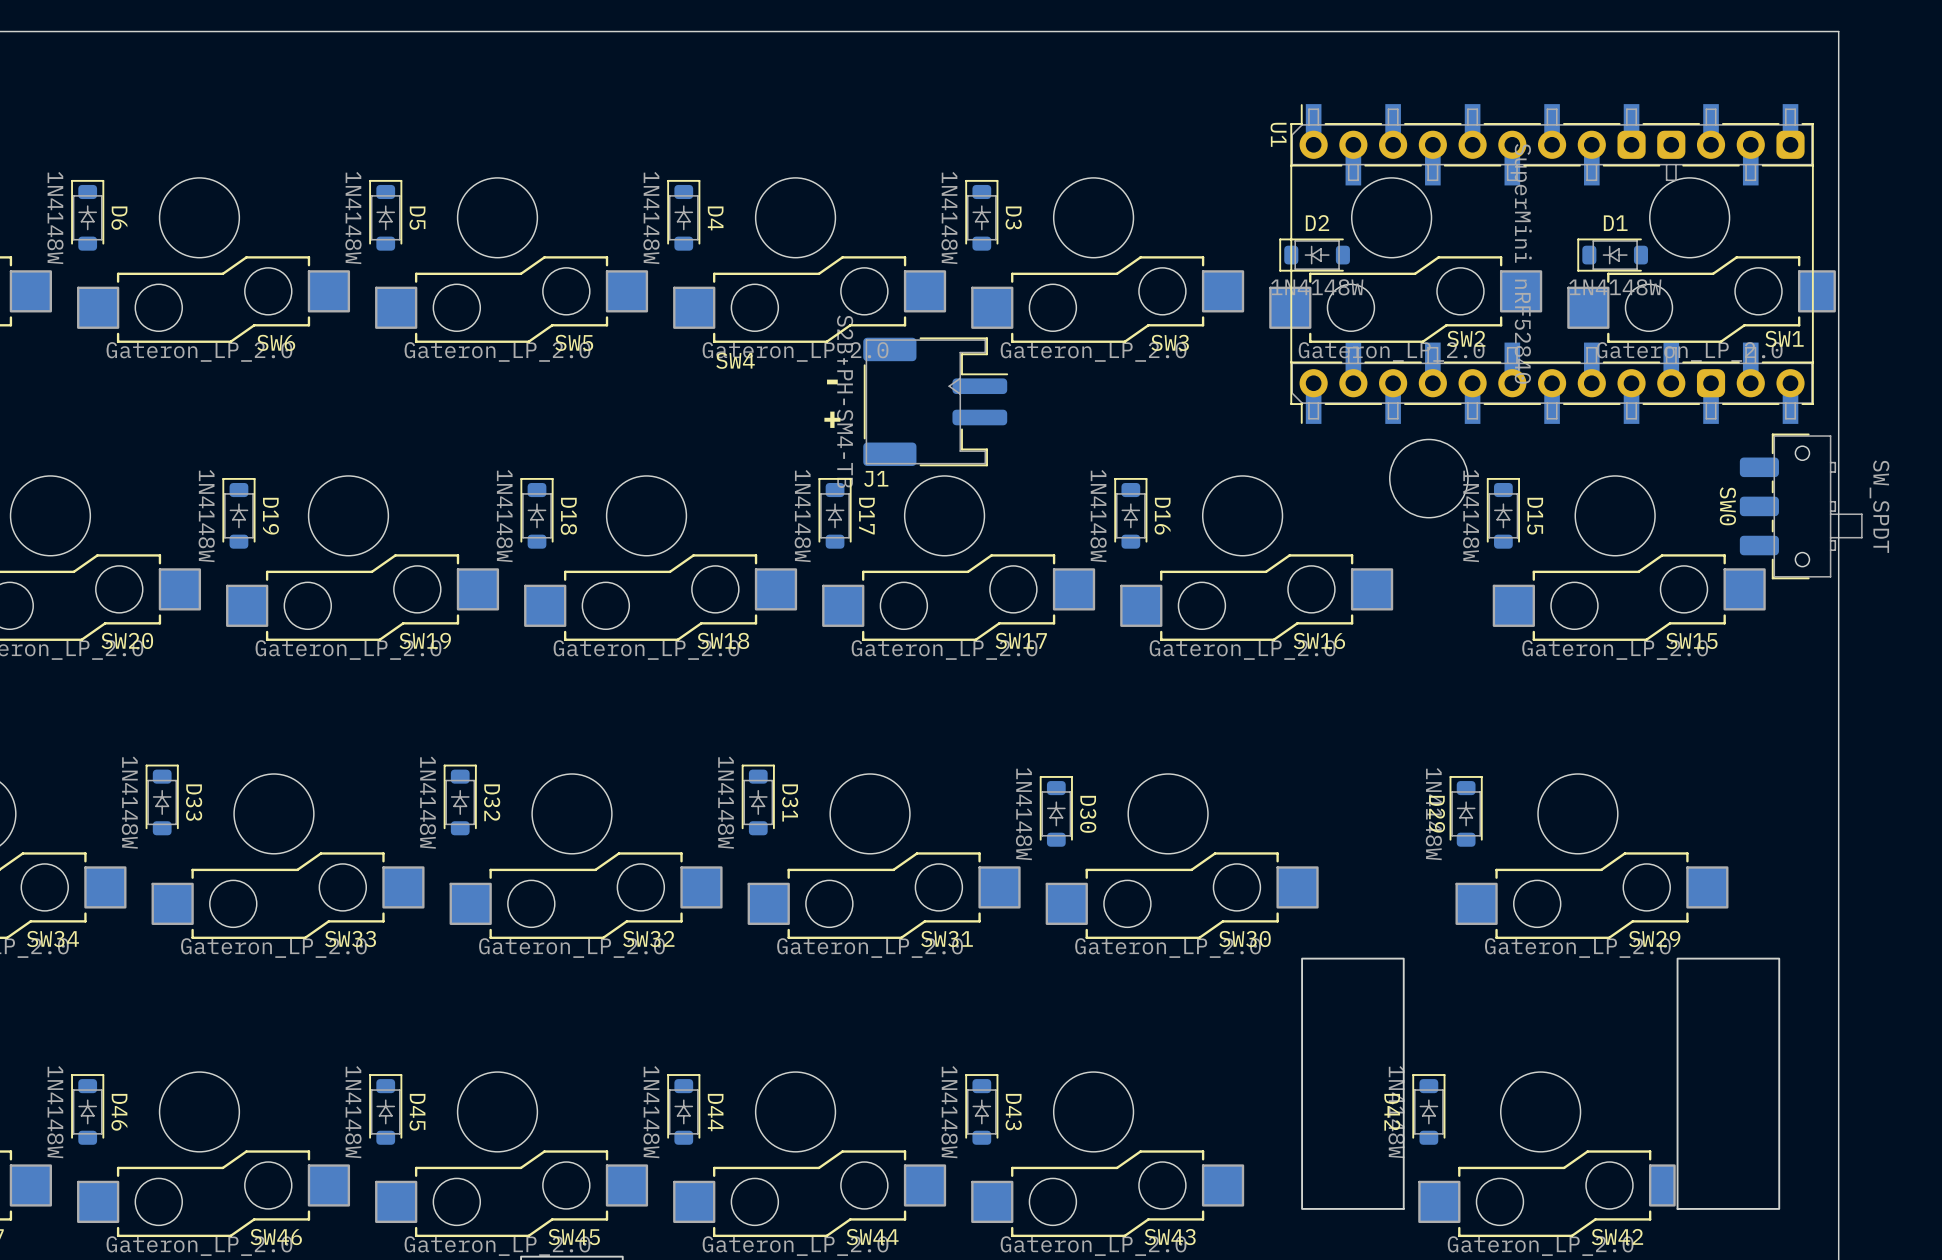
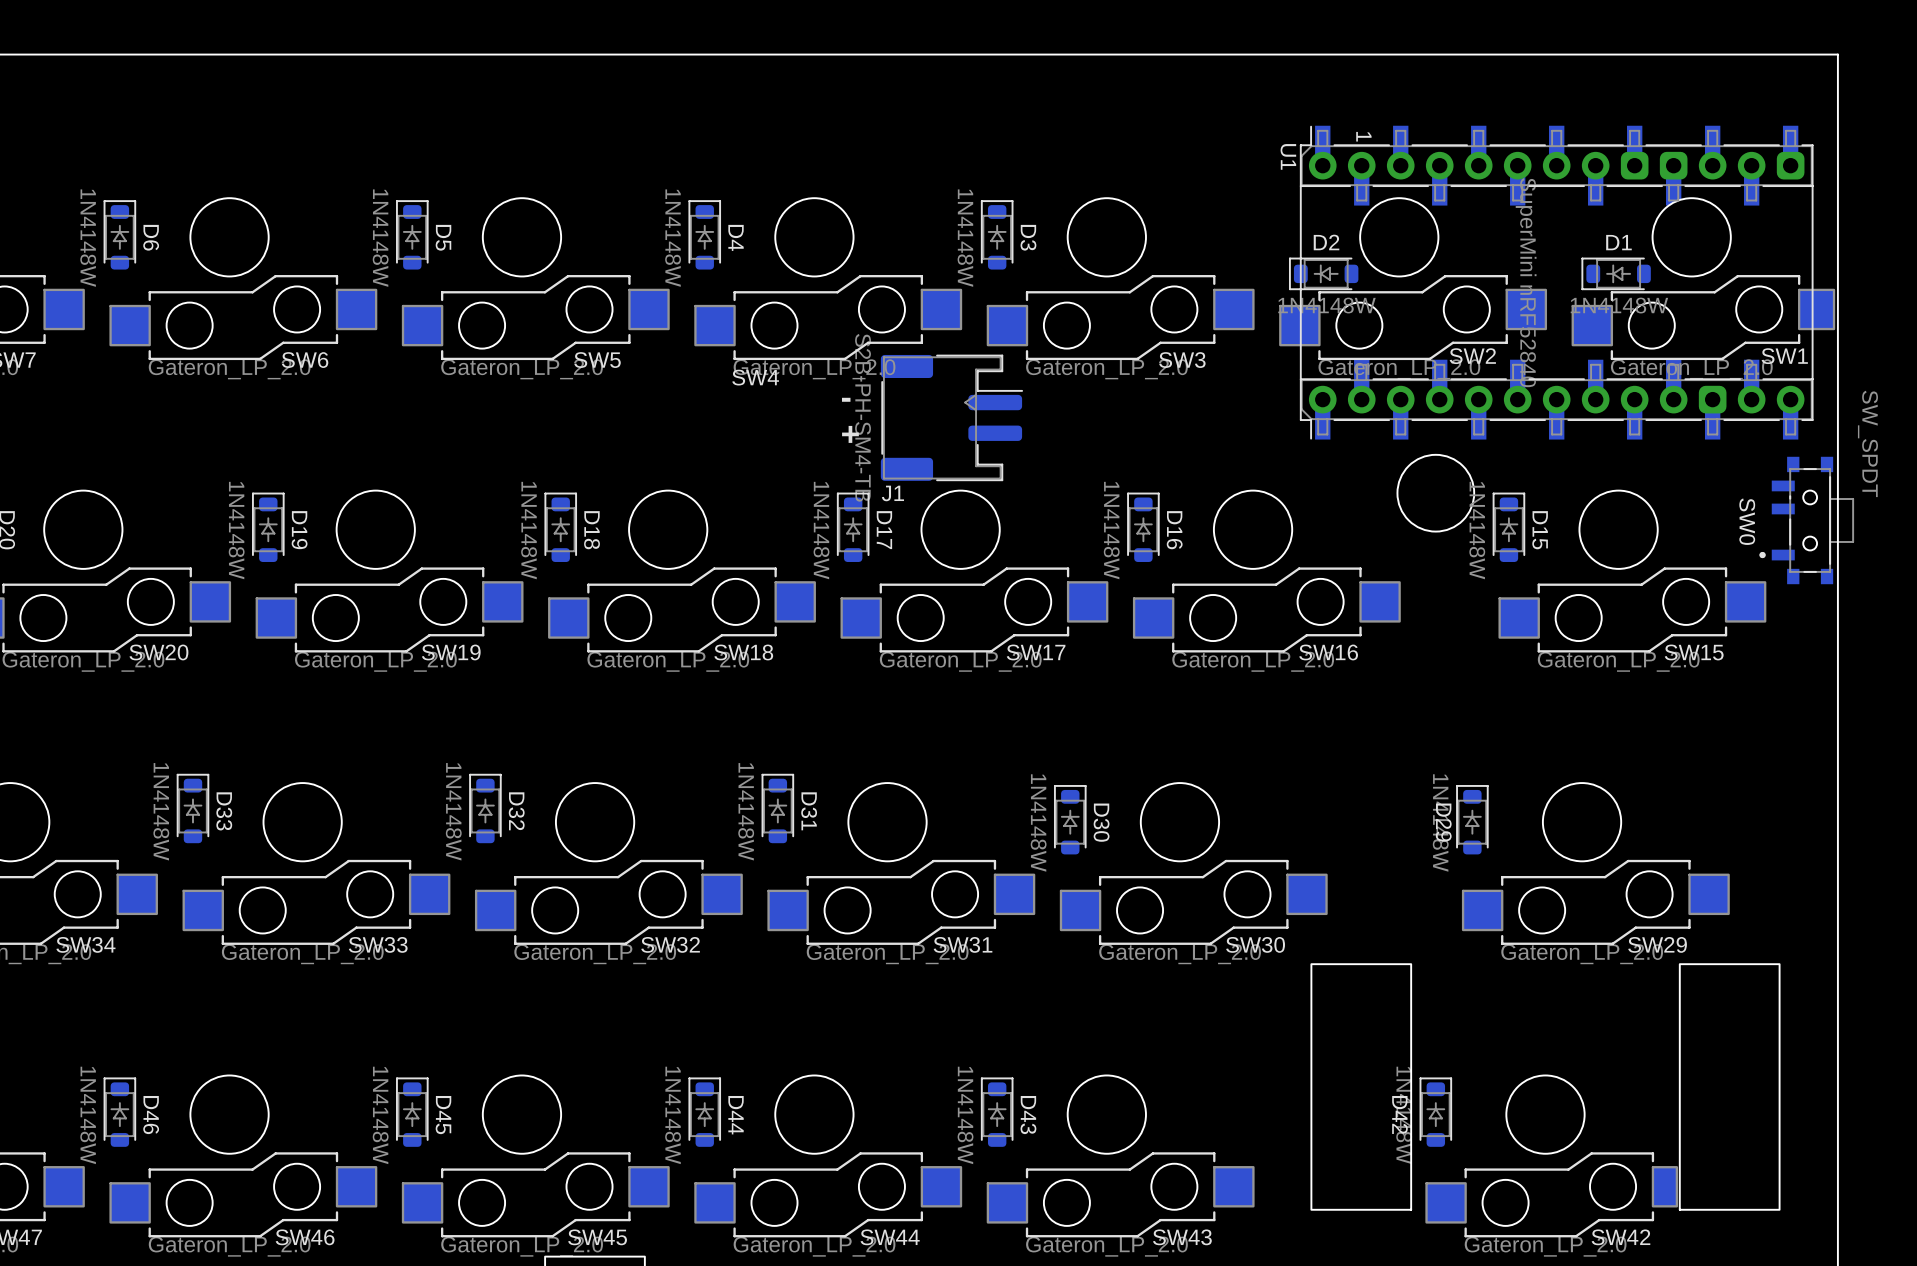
U1 footprint: [1290, 104, 1814, 424] -> [1299, 125, 1814, 440]
SW0 footprint: [1739, 433, 1863, 580] -> [1759, 456, 1855, 585]
SW0 value position: SW_SPDT (1879, 506) -> SW_SPDT (1867, 443)

